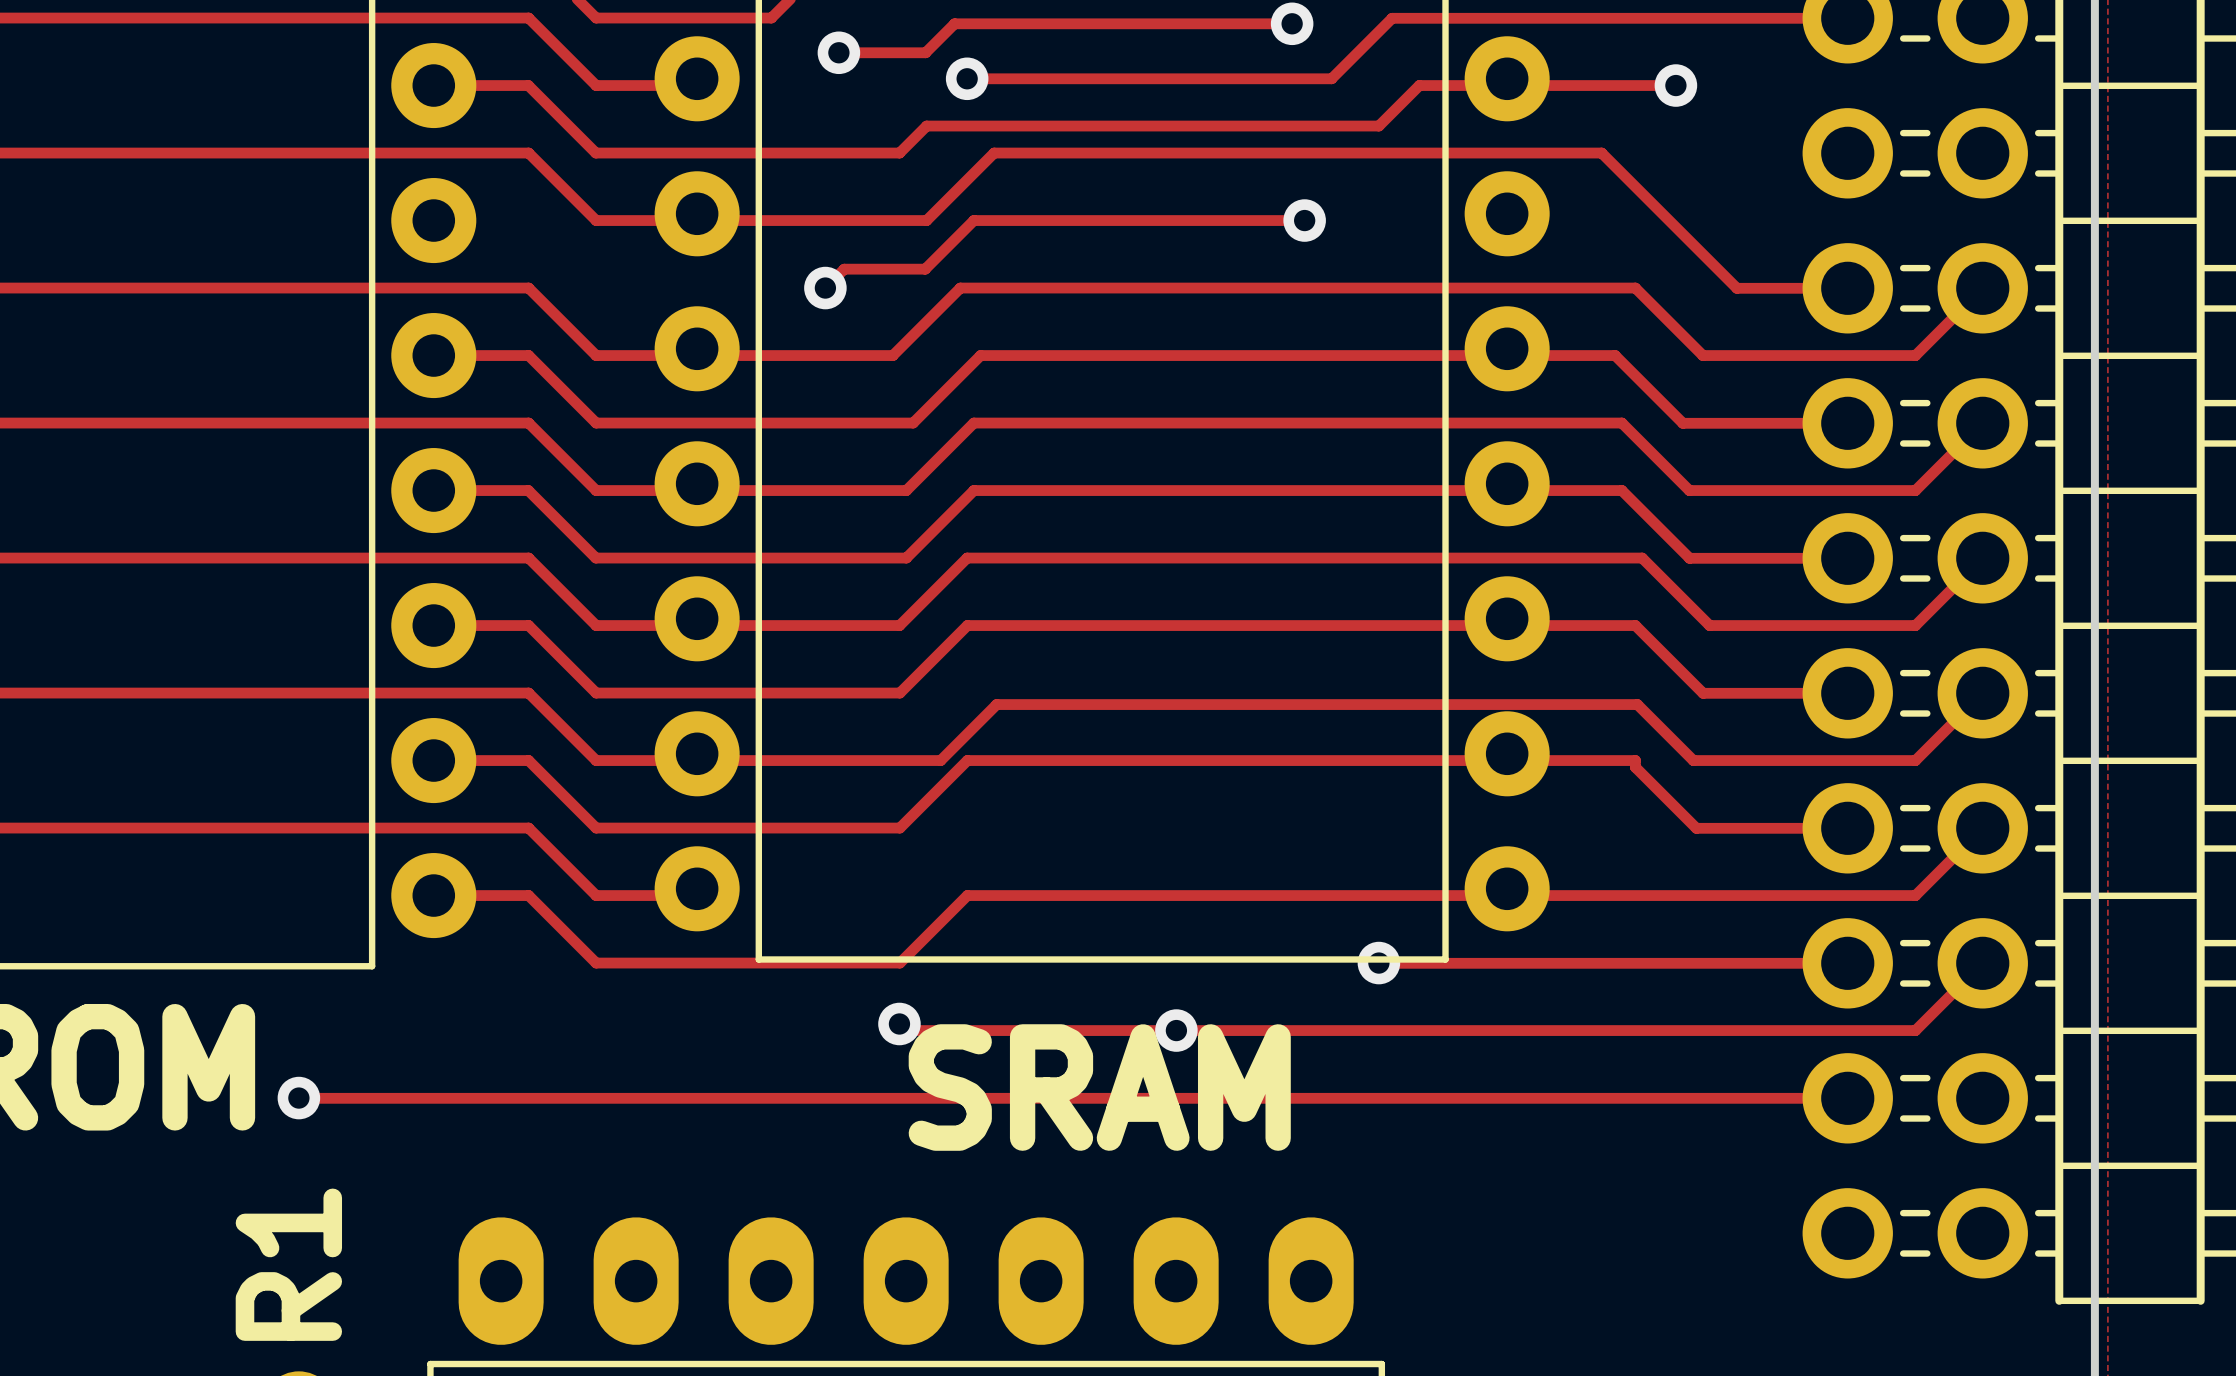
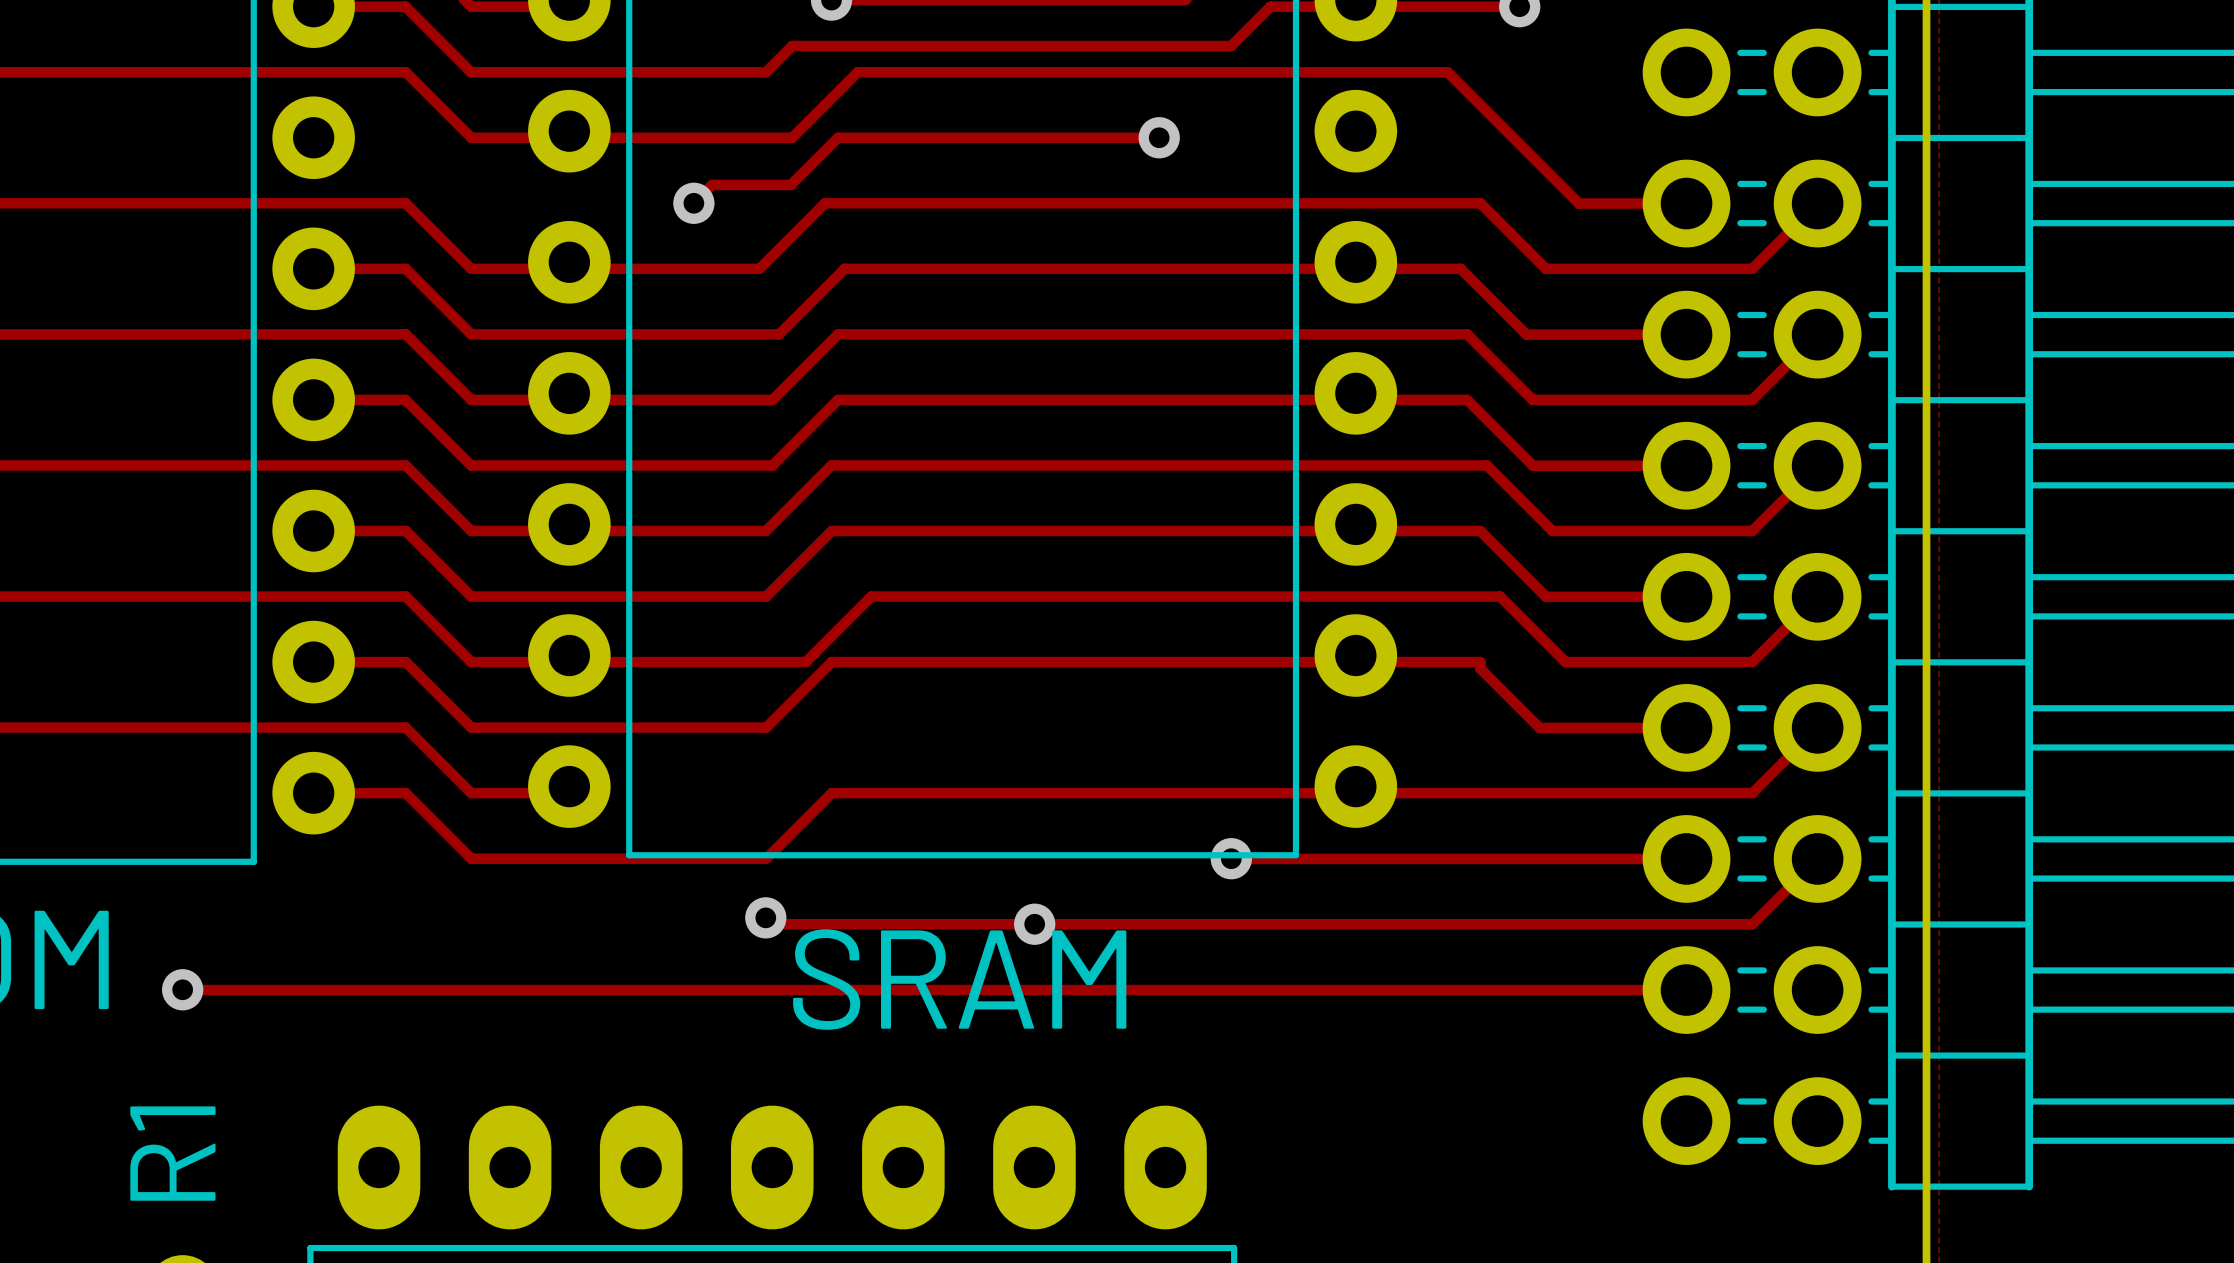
track: (996, 704) (1637, 704) (1693, 760) (1723, 760) -> (860, 607) (871, 596) (1500, 596) (1565, 662)

